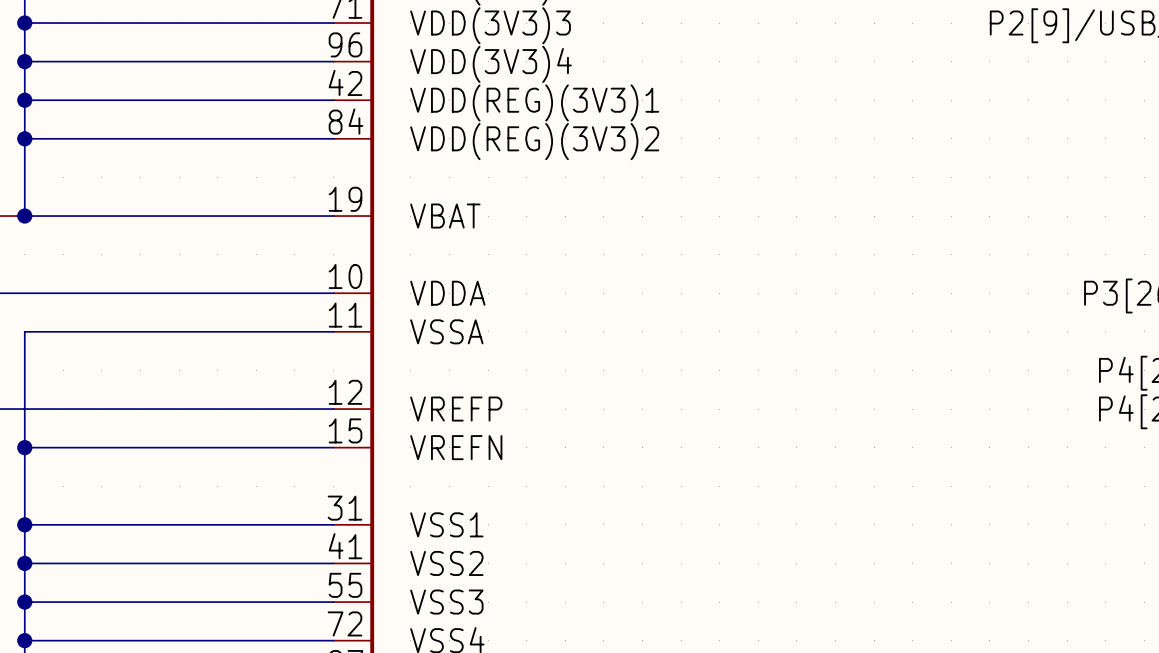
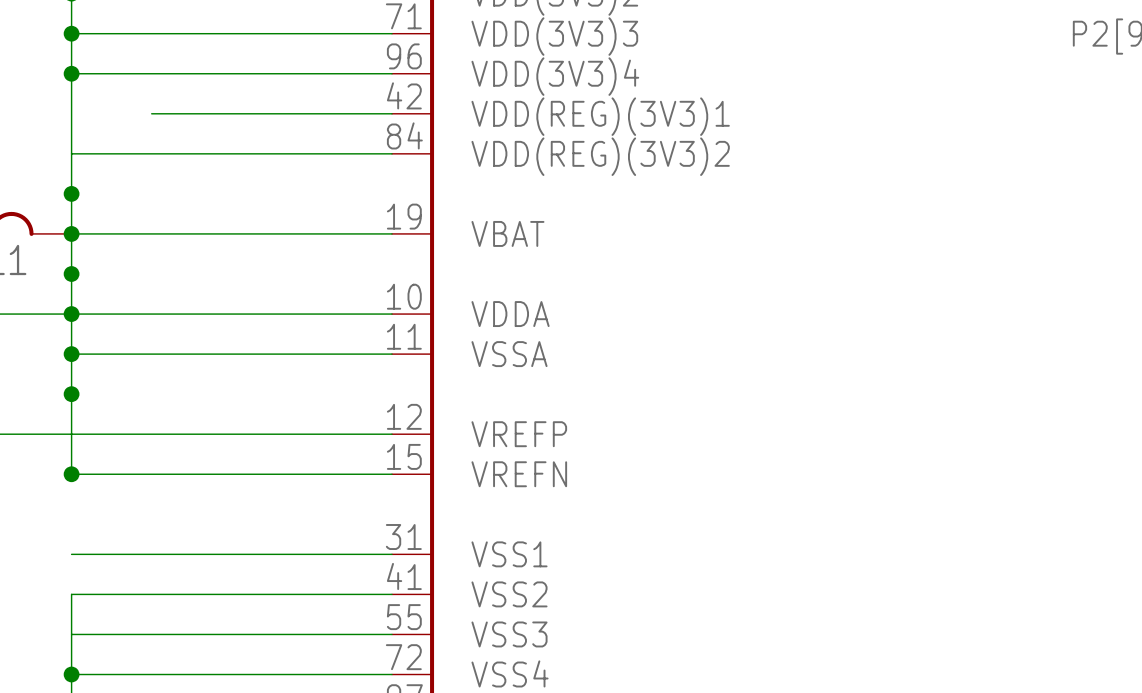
wire: (24, 100) (101, 100) -> none
junction: (24, 100) -> none
junction: (24, 138) -> none
junction: none -> (71, 193)
junction: none -> (71, 273)
junction: none -> (71, 314)
junction: none -> (71, 354)
junction: none -> (71, 394)
wire: (24, 447) (24, 563) -> (71, 233) (71, 354)
junction: (24, 524) -> none
junction: (24, 563) -> none
junction: (24, 602) -> none

